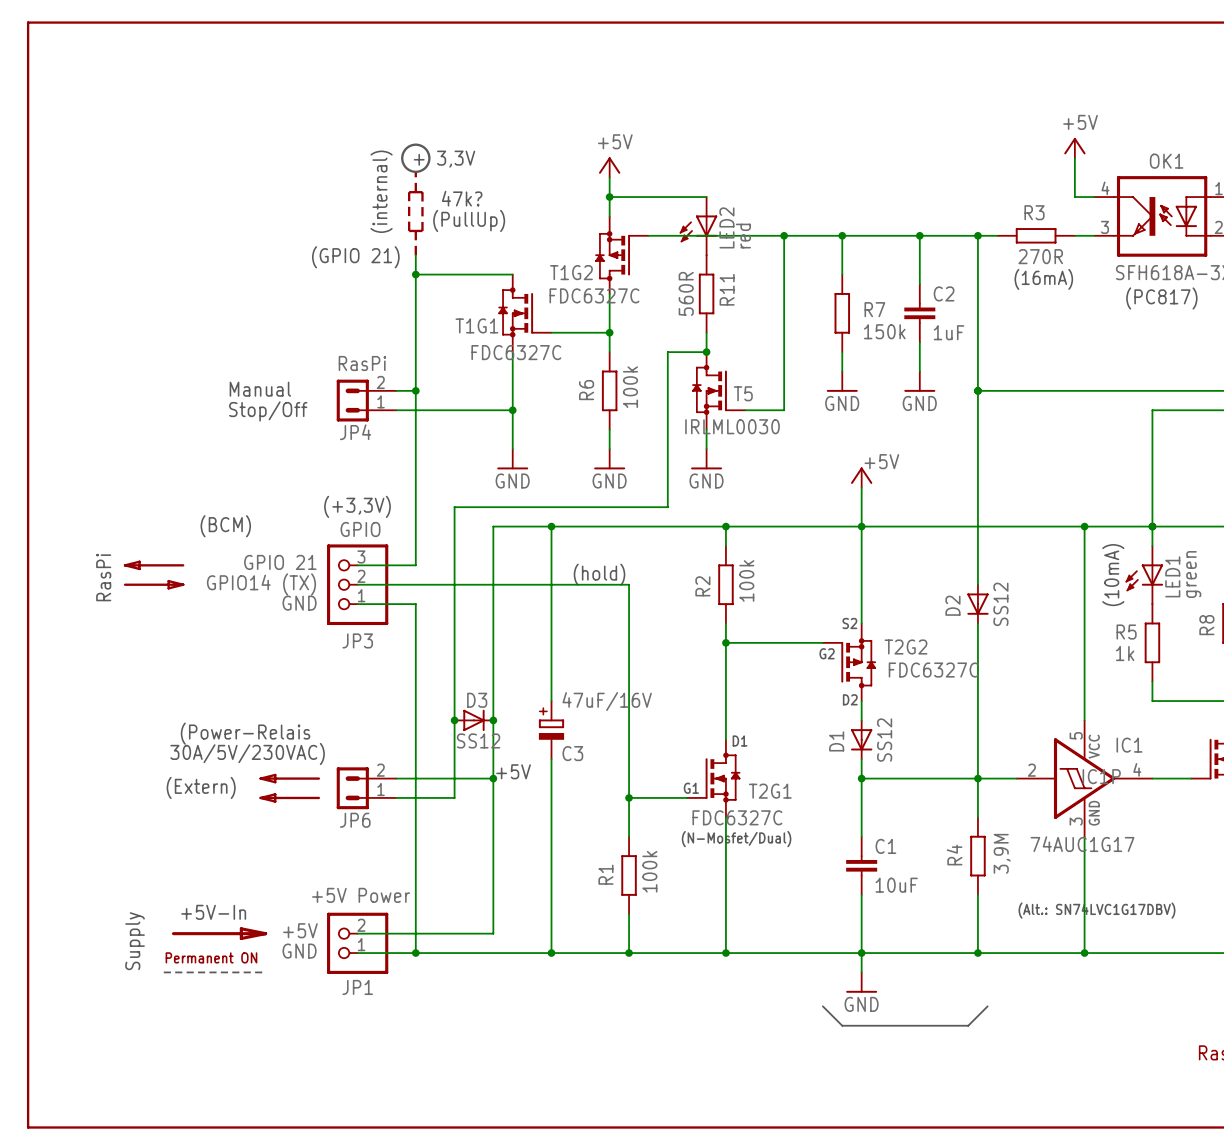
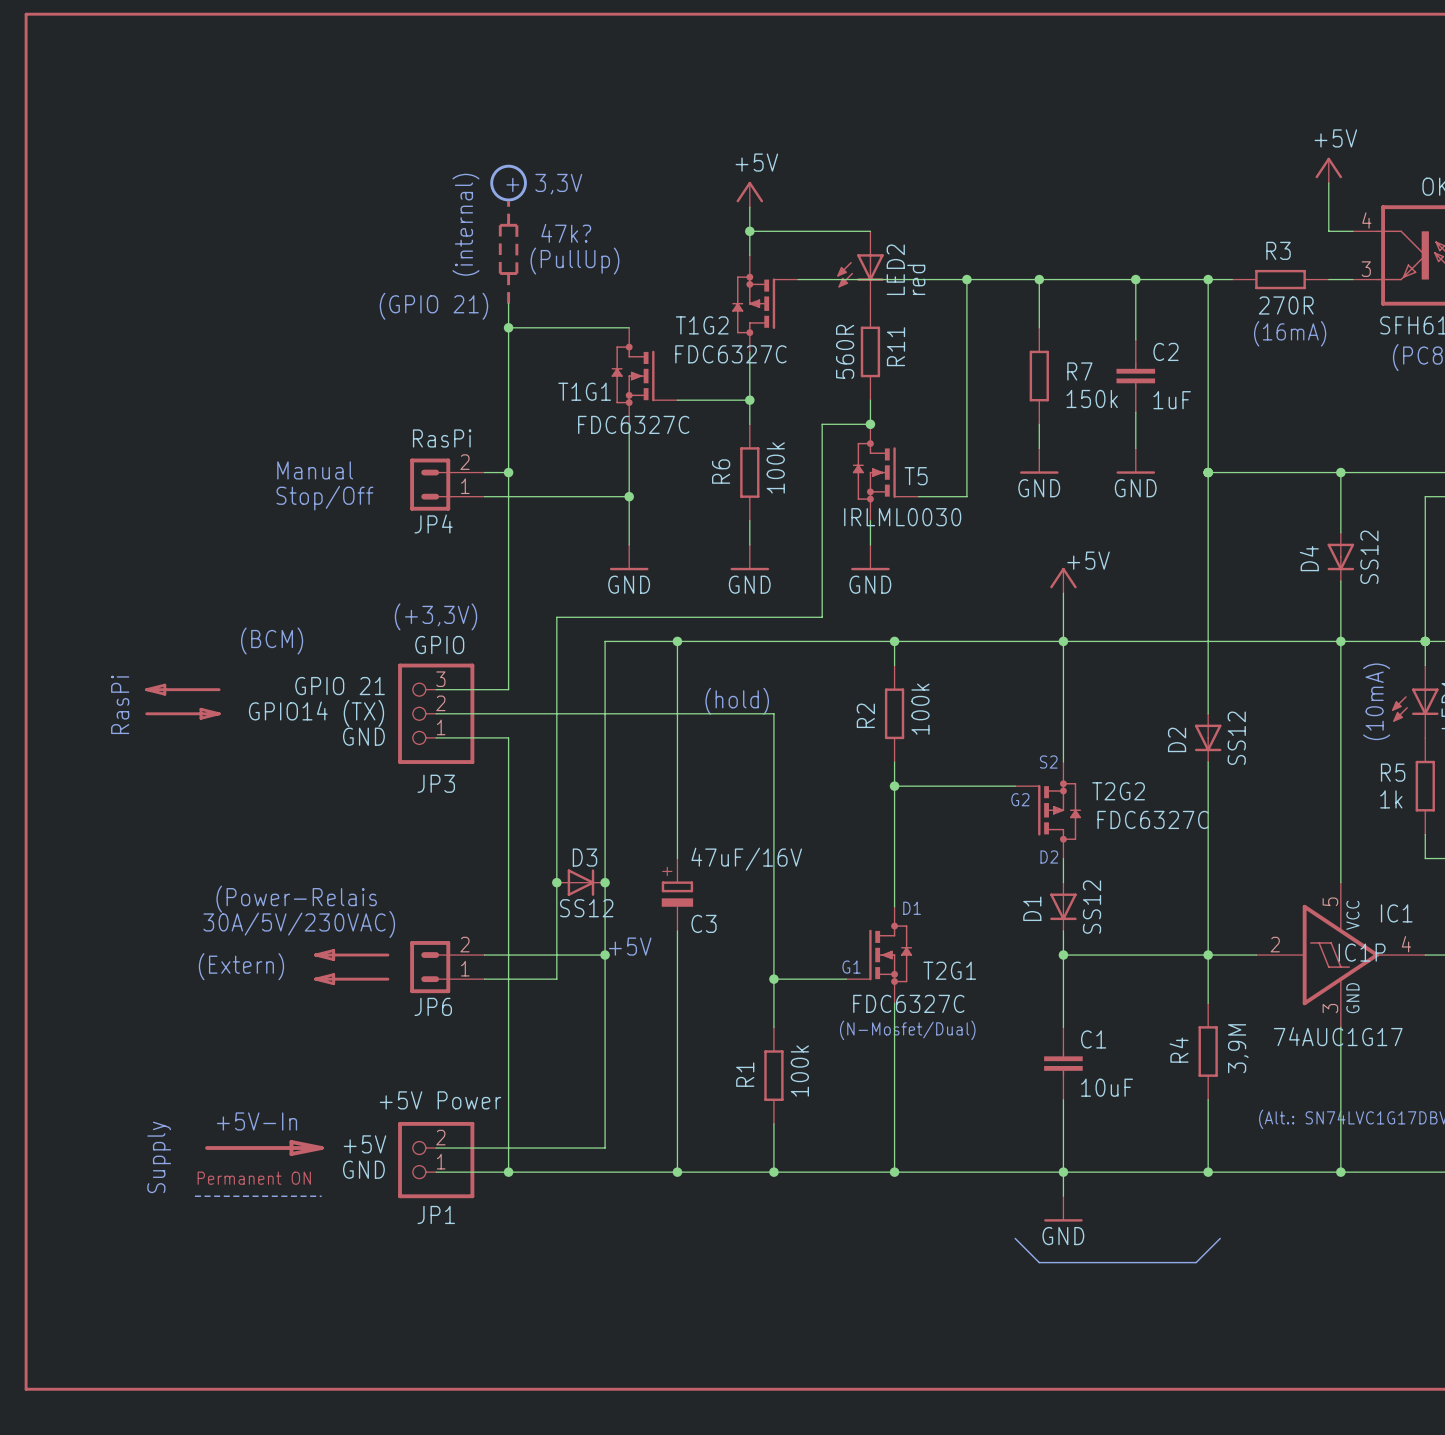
wire: none -> (1340, 472) (1340, 532)
junction: none -> (1340, 472)
D4: none -> SS12 (1340, 556)
wire: none -> (1340, 581) (1340, 641)

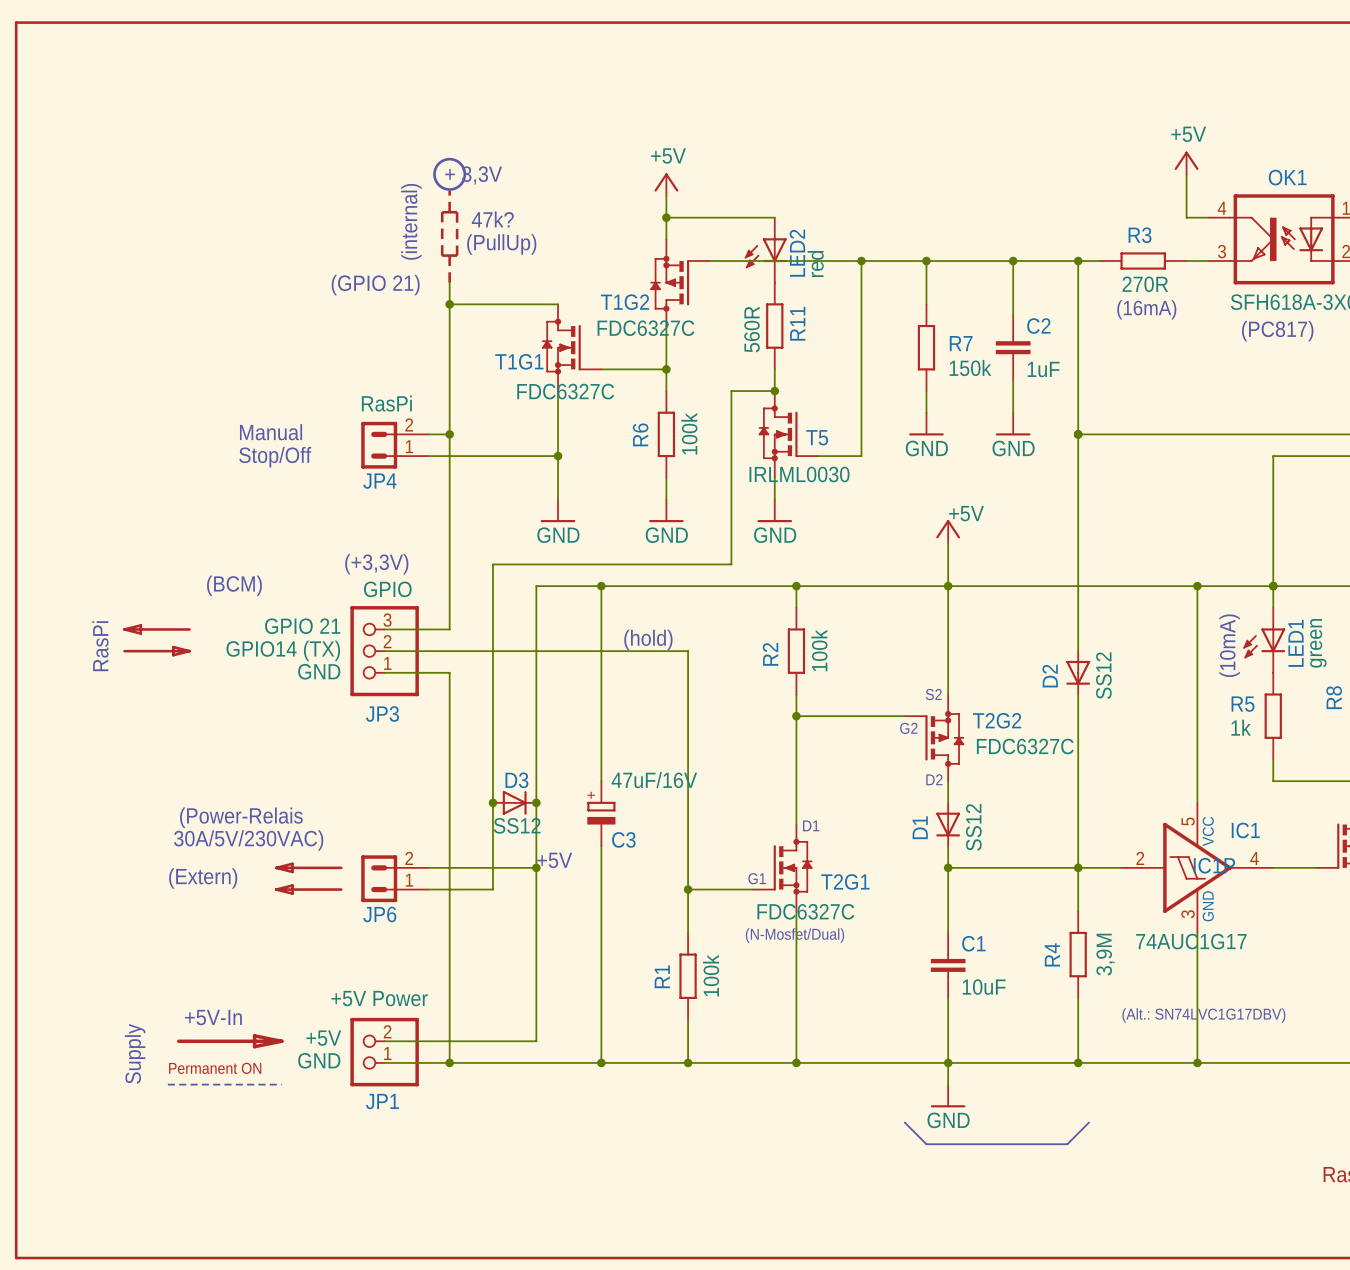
wire: (1340, 472) (1340, 532) -> none
junction: (1340, 472) -> none
D4: SS12 (1340, 556) -> none
wire: (1340, 581) (1340, 641) -> none

